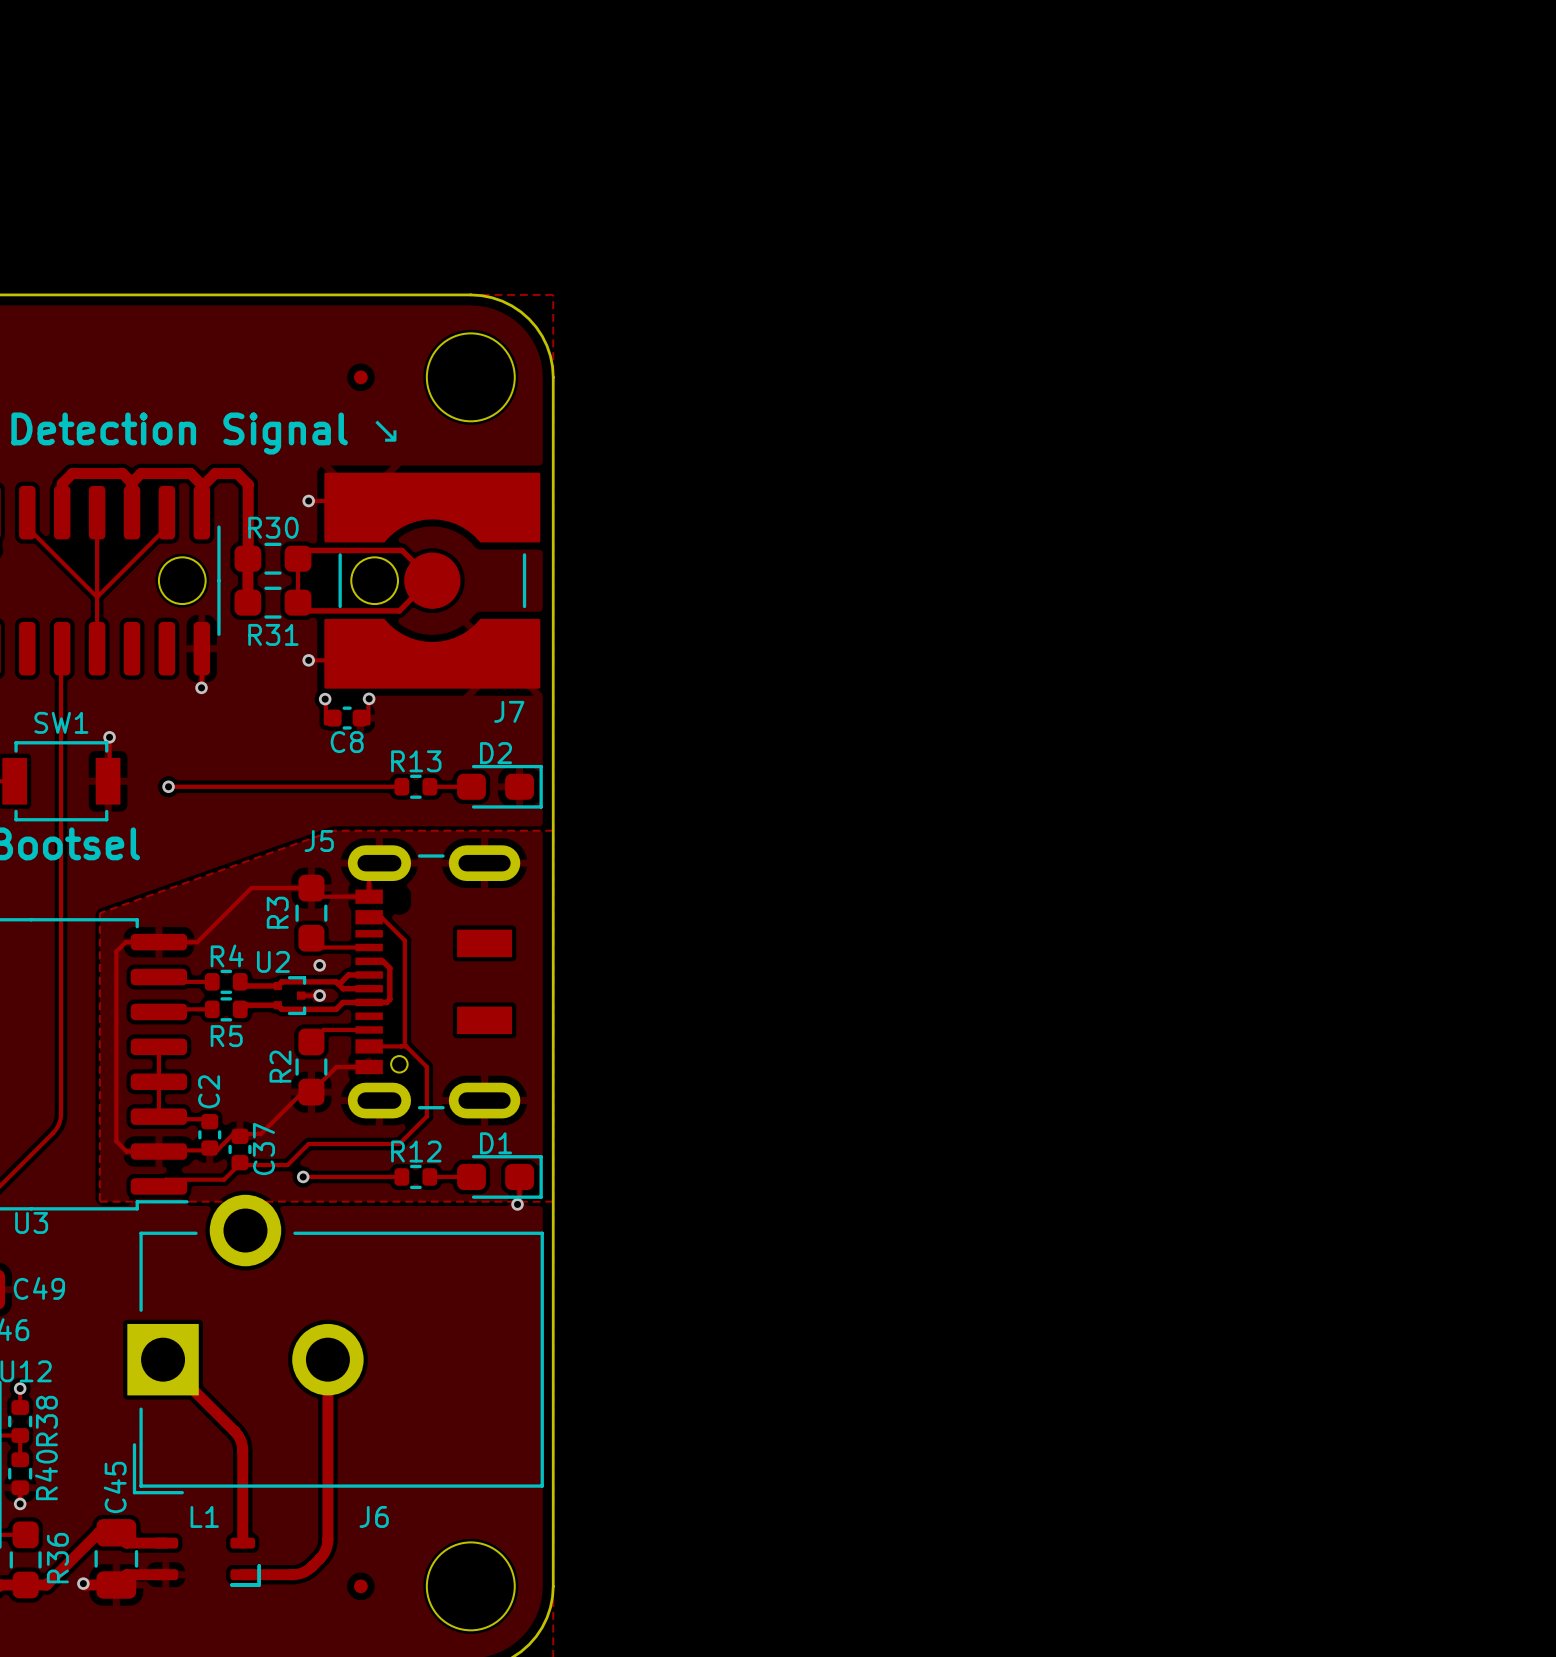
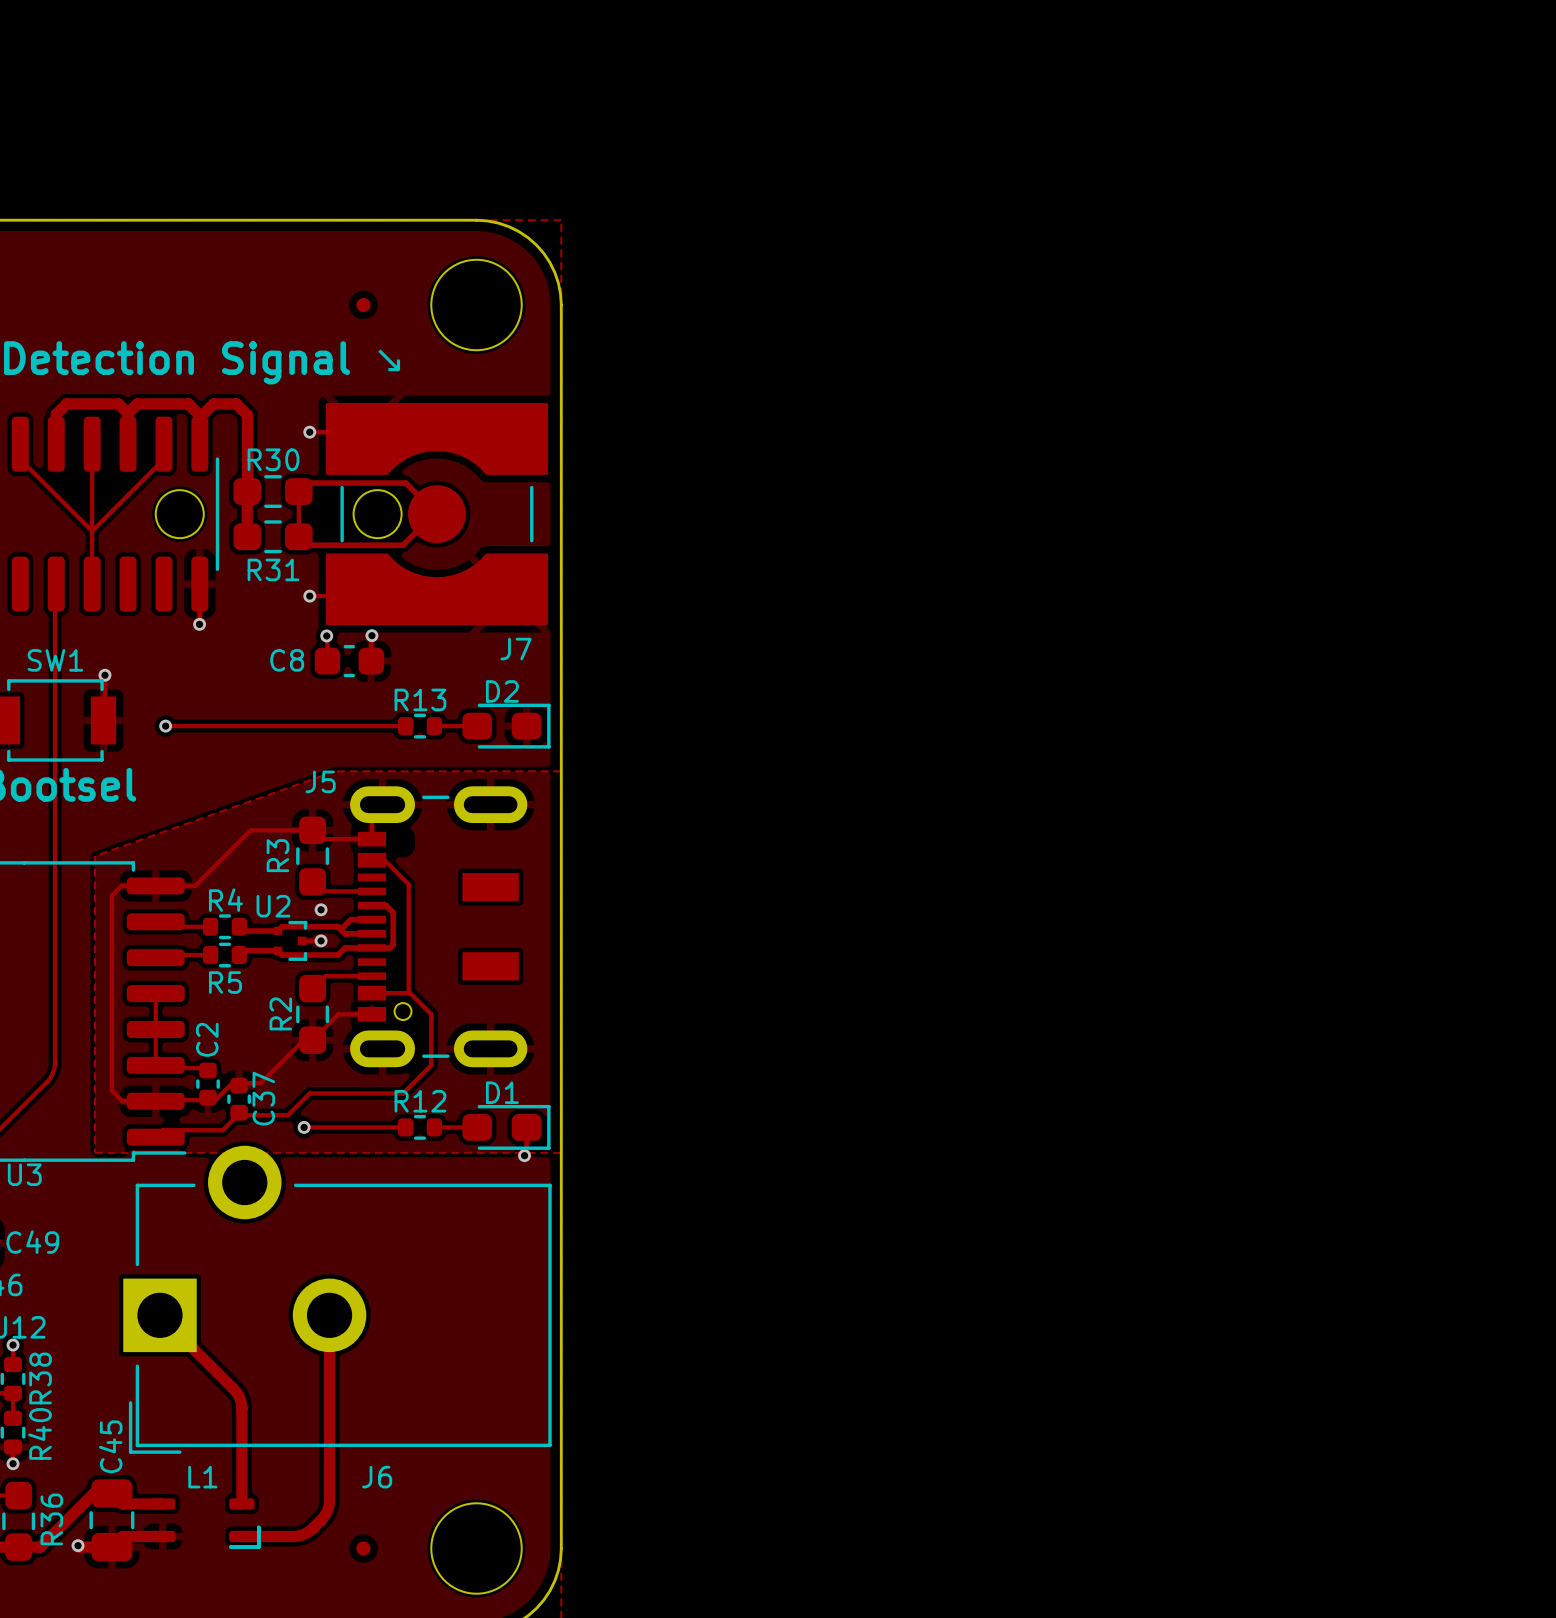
C8 footprint: [326, 706, 369, 730] -> [314, 644, 384, 678]
C8 name position: C8 (347, 742) -> C8 (287, 660)

